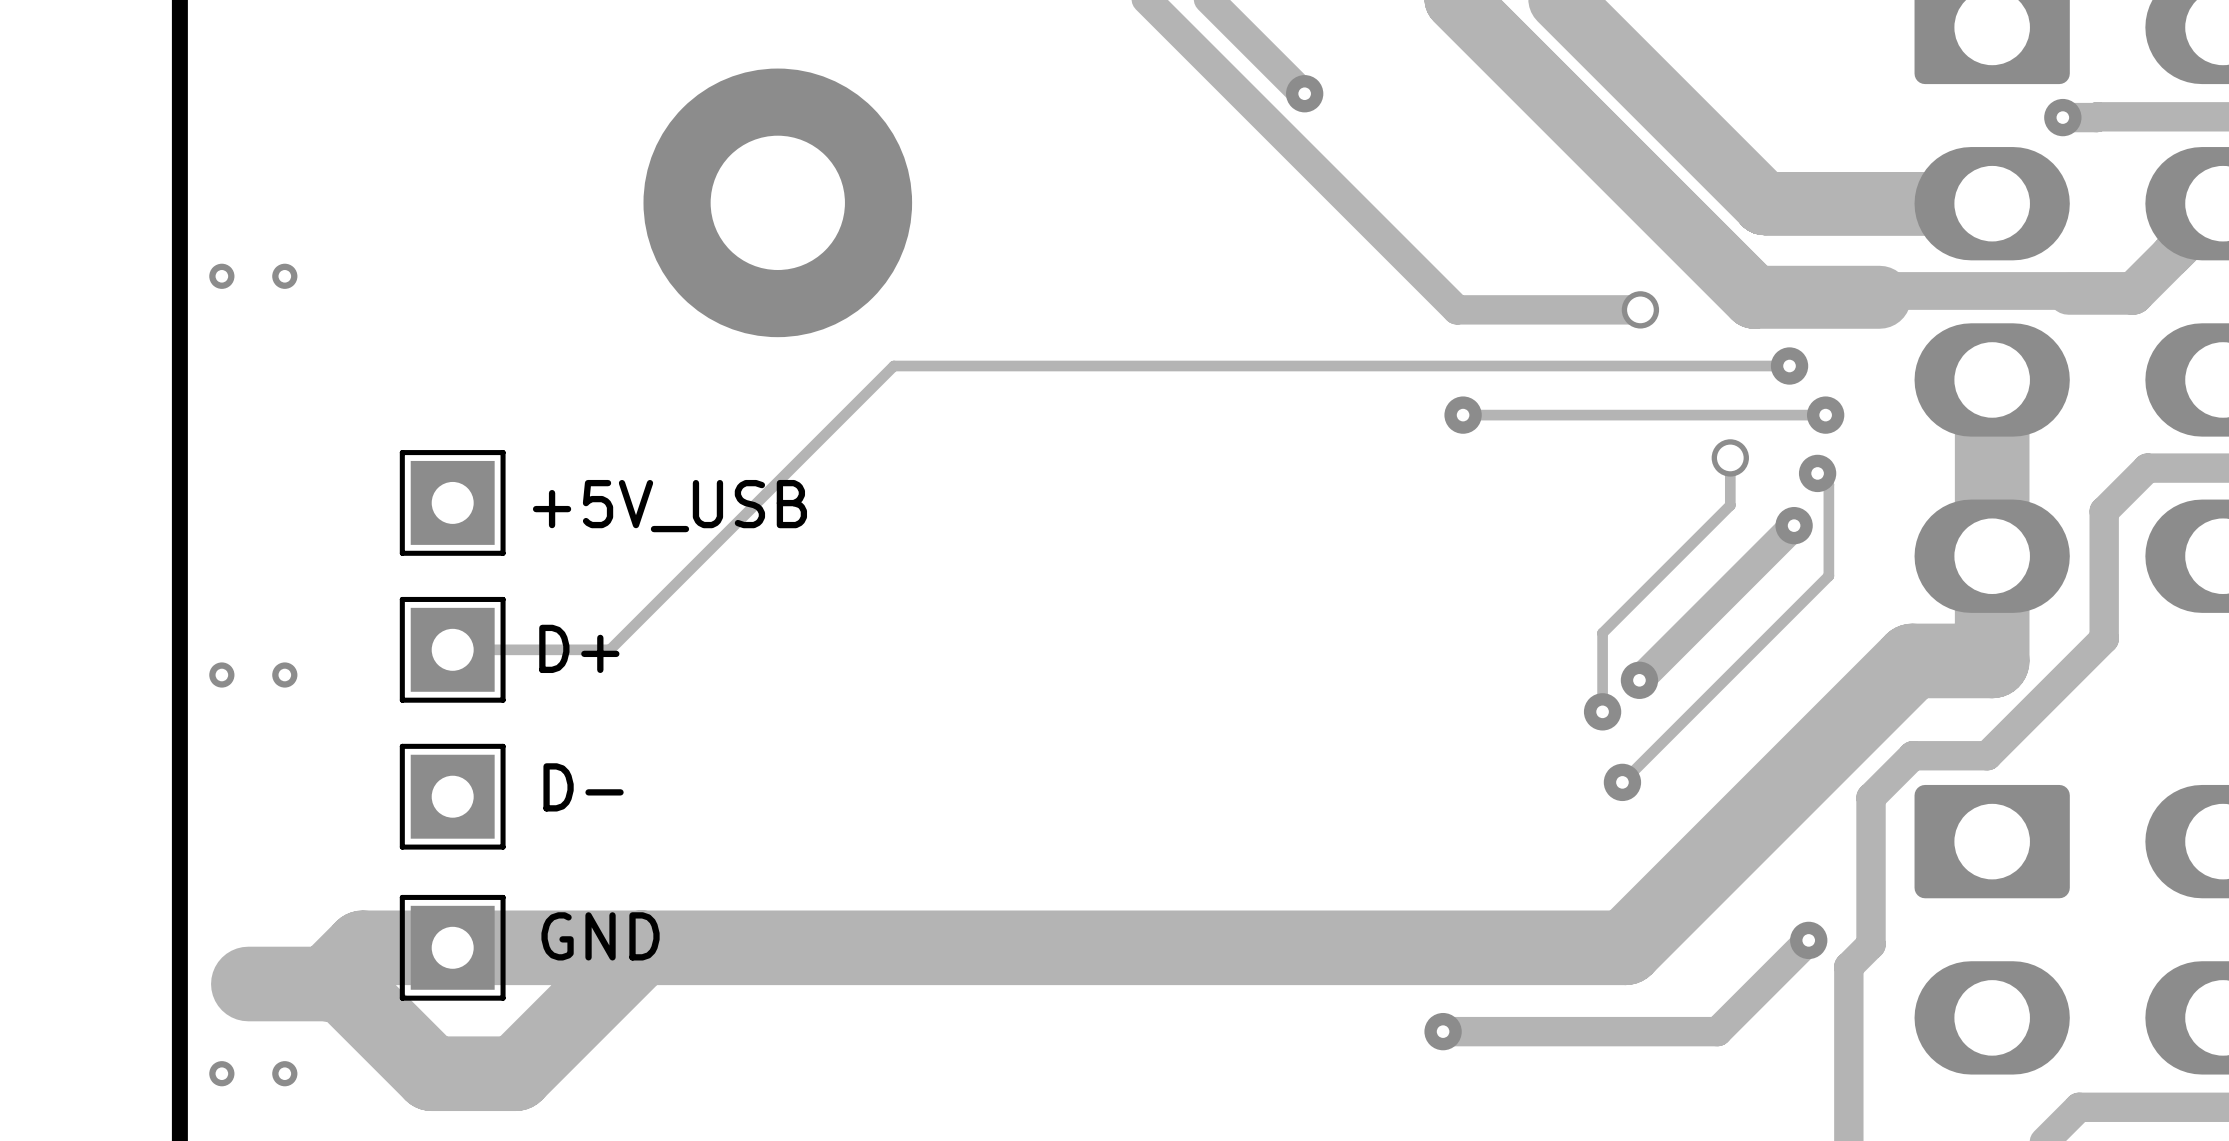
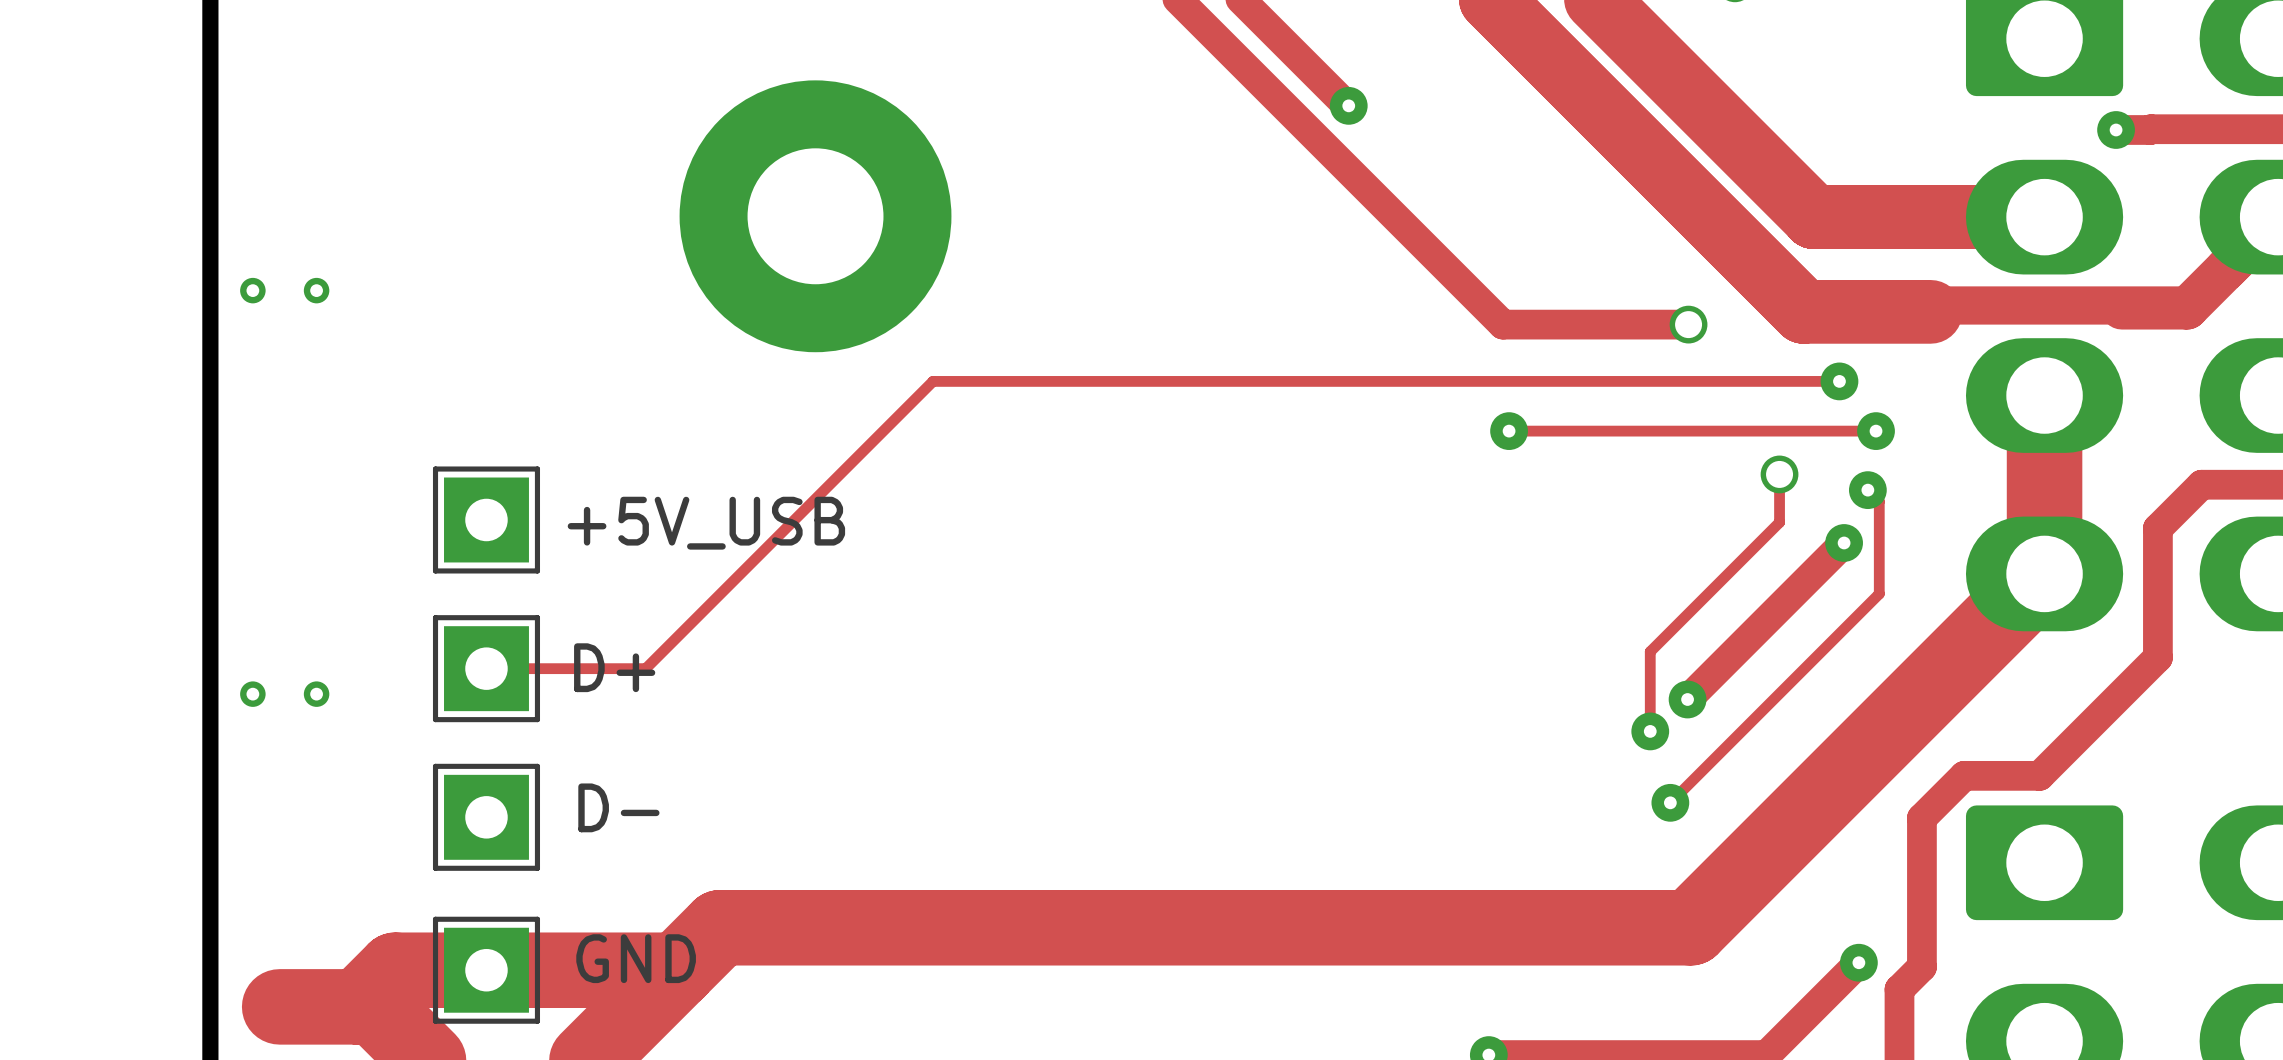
track: (1992, 556) (1992, 660) (1912, 660) (1625, 947) (641, 947) -> (2044, 573) (1690, 927) (720, 927) (677, 970)

